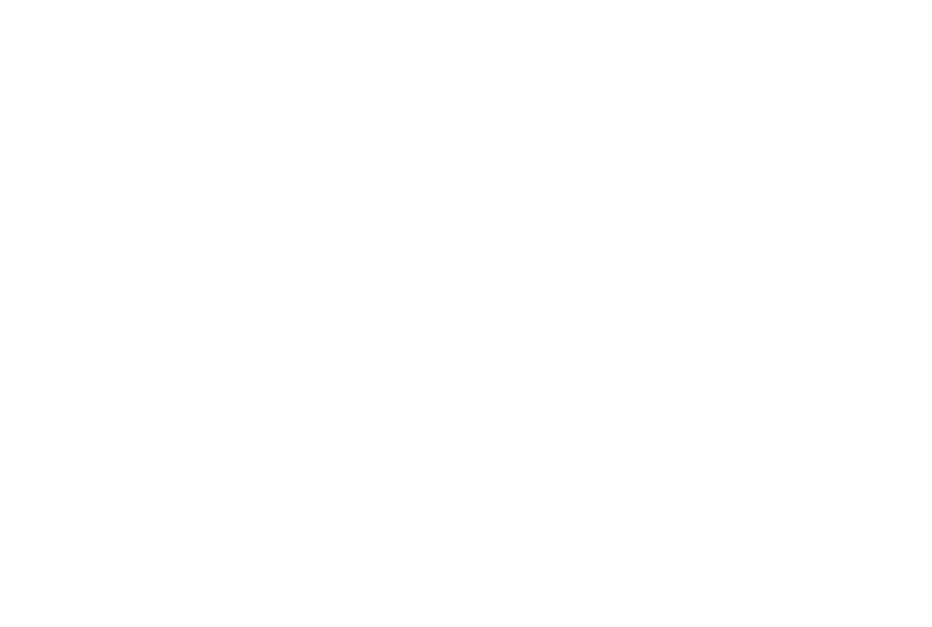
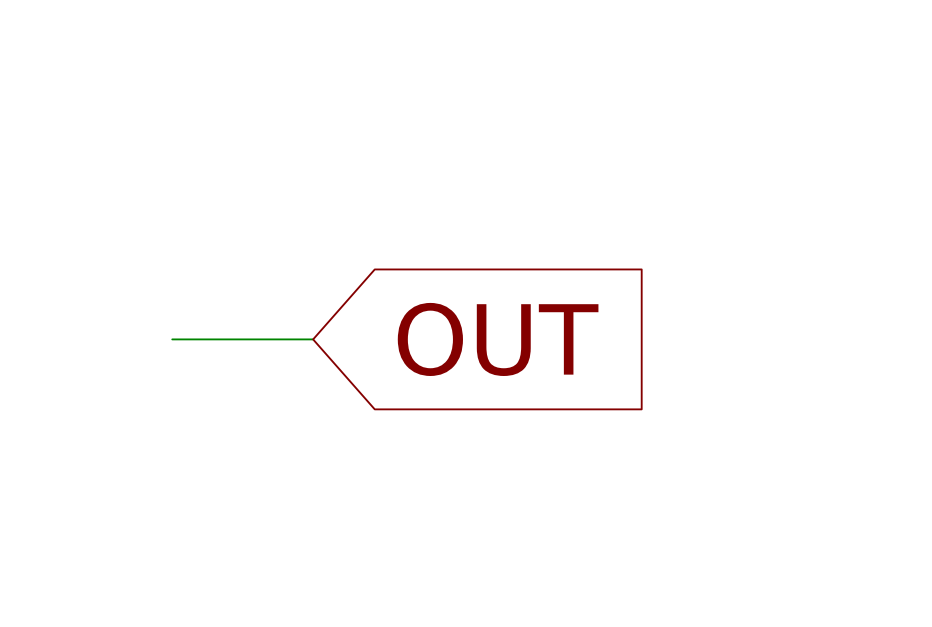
wire: none -> (172, 339) (313, 339)
global label: none -> OUT (498, 339)

